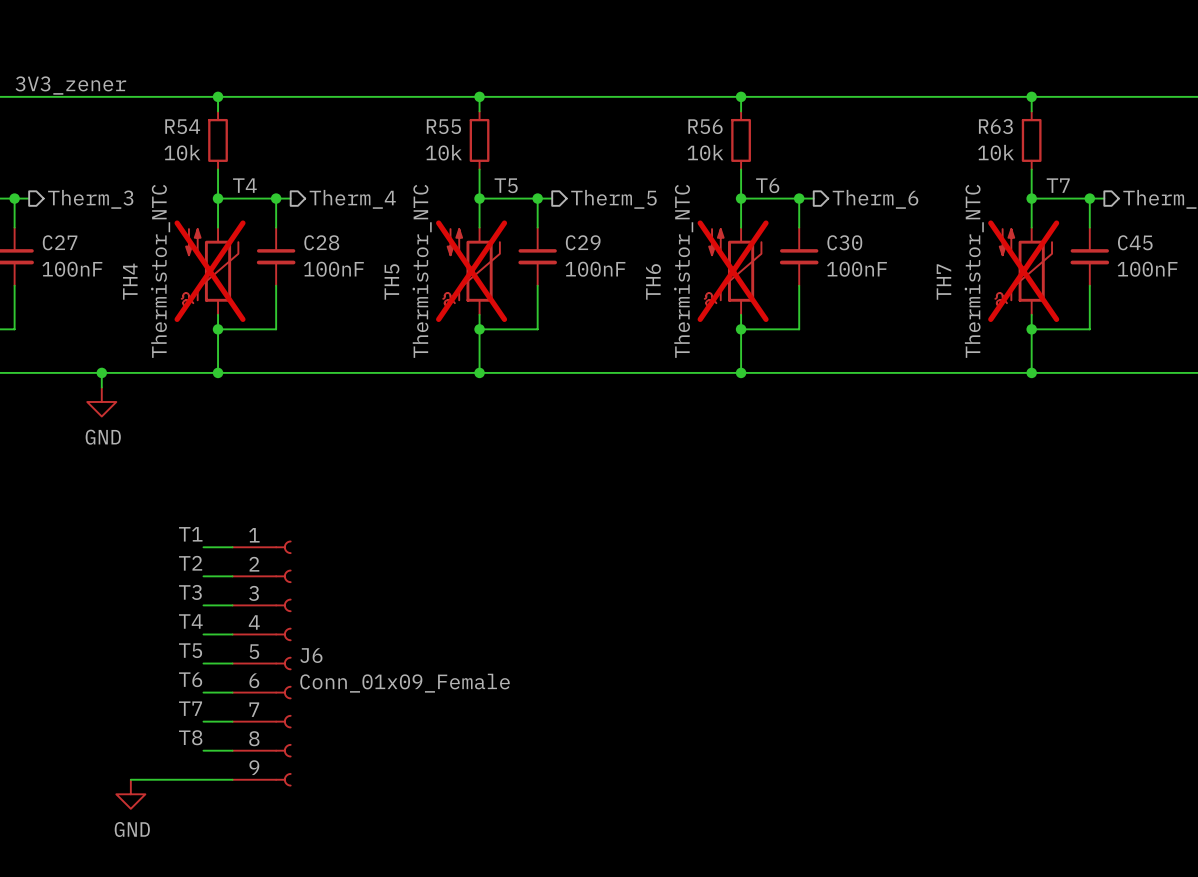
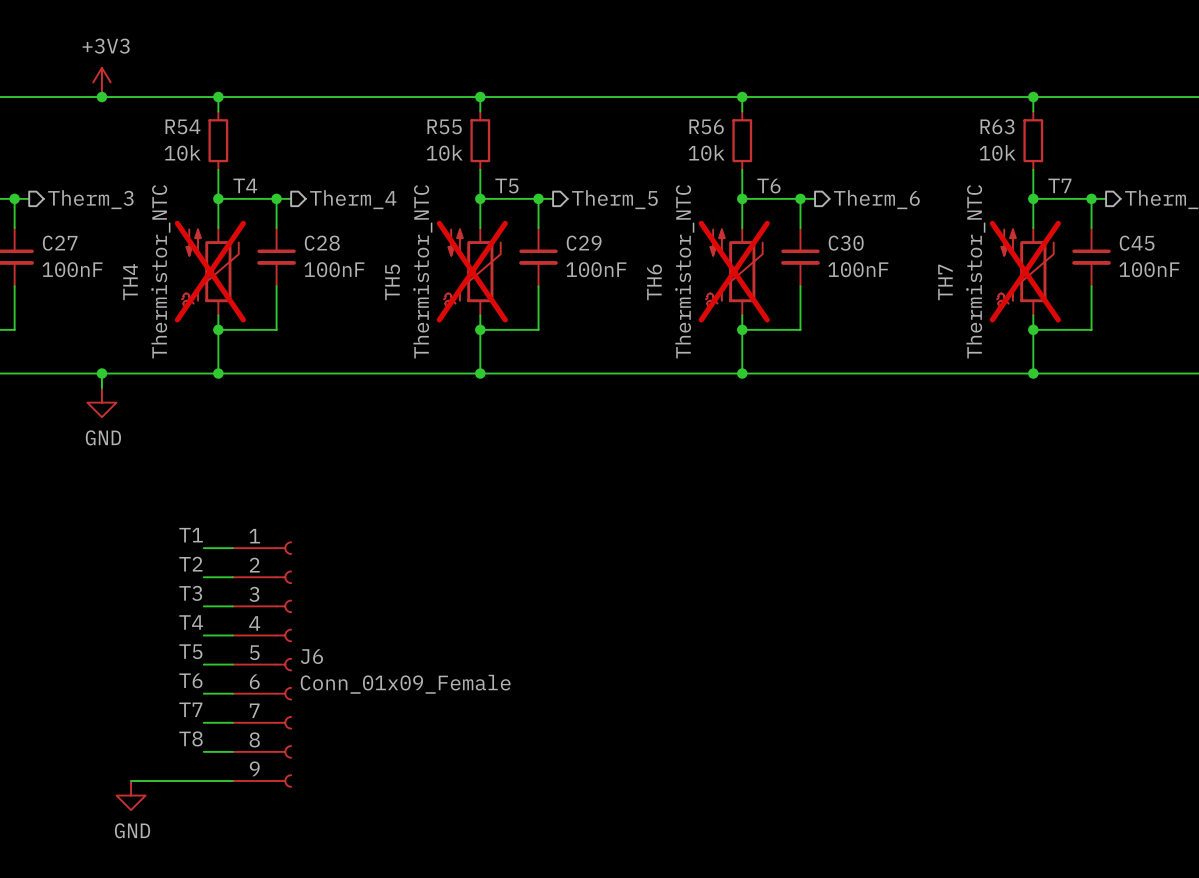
power symbol: none -> +3V3 (101, 82)
label: 3V3_zener (70, 85) -> none
junction: none -> (101, 97)

